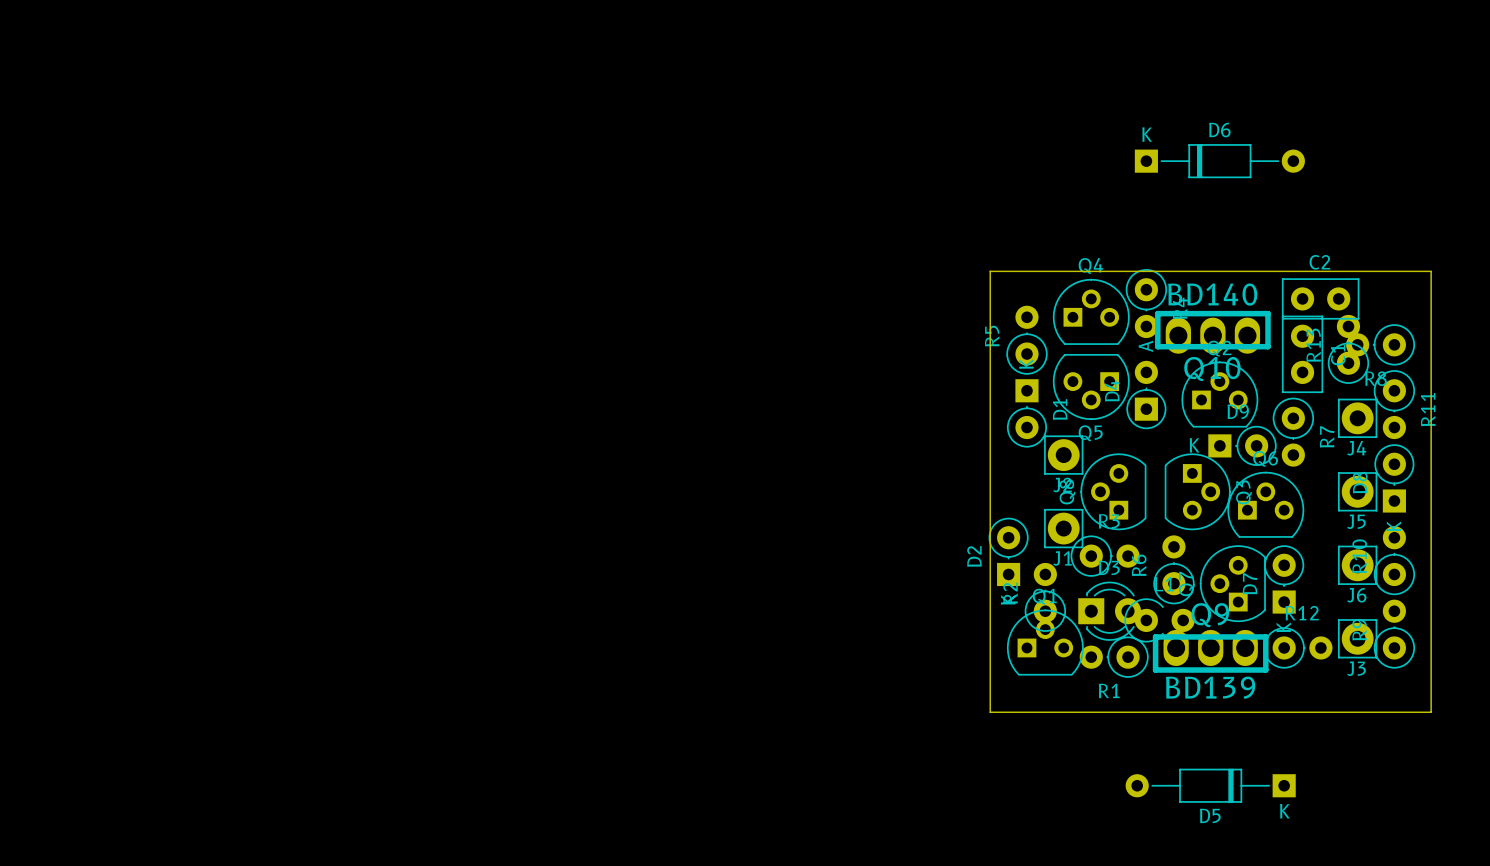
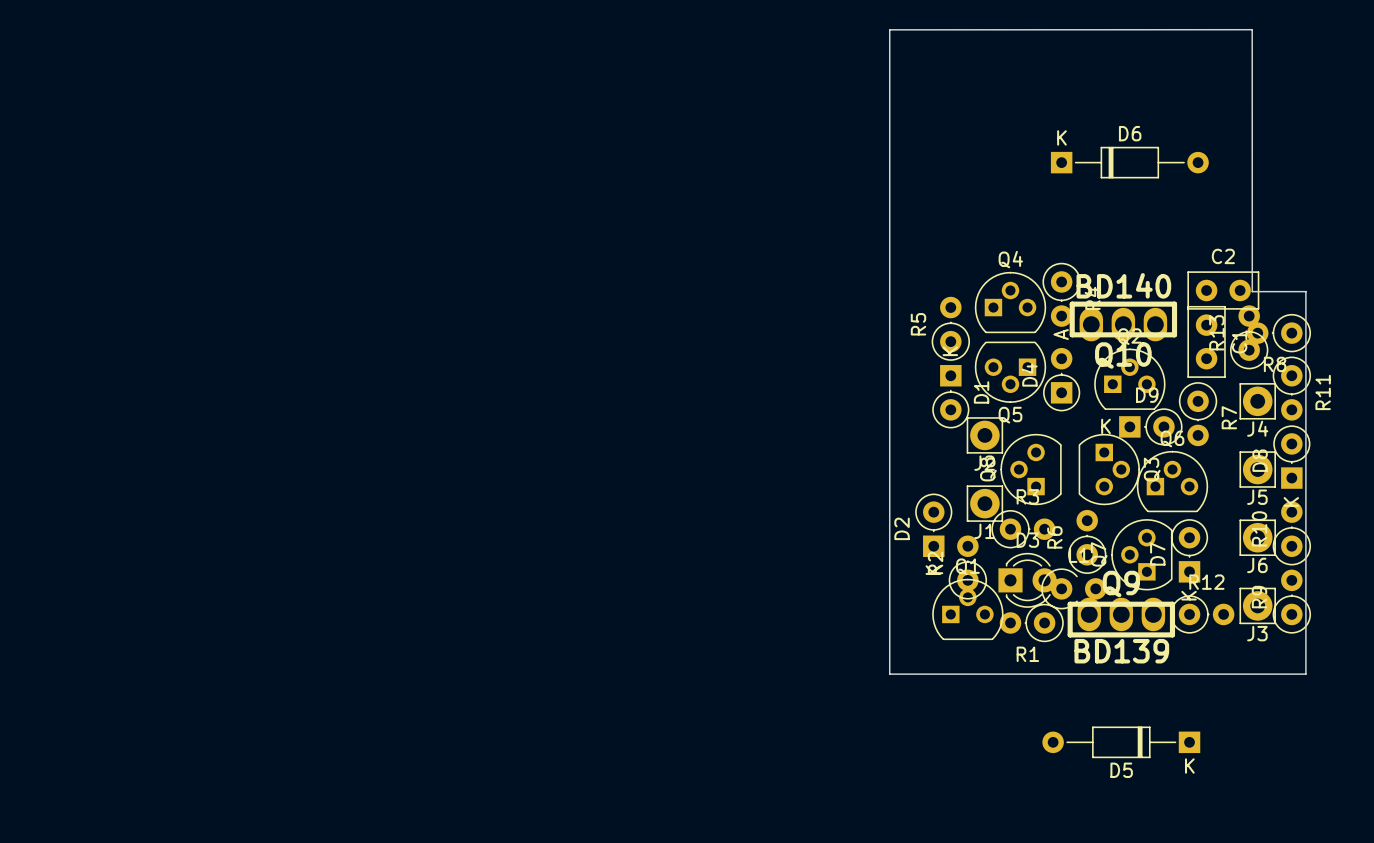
board edge: (990, 712) (990, 271) (1431, 271) (1431, 712) (1409, 712) -> (916, 674) (889, 674) (889, 29) (1252, 29) (1252, 291) (1305, 291) (1305, 674)

